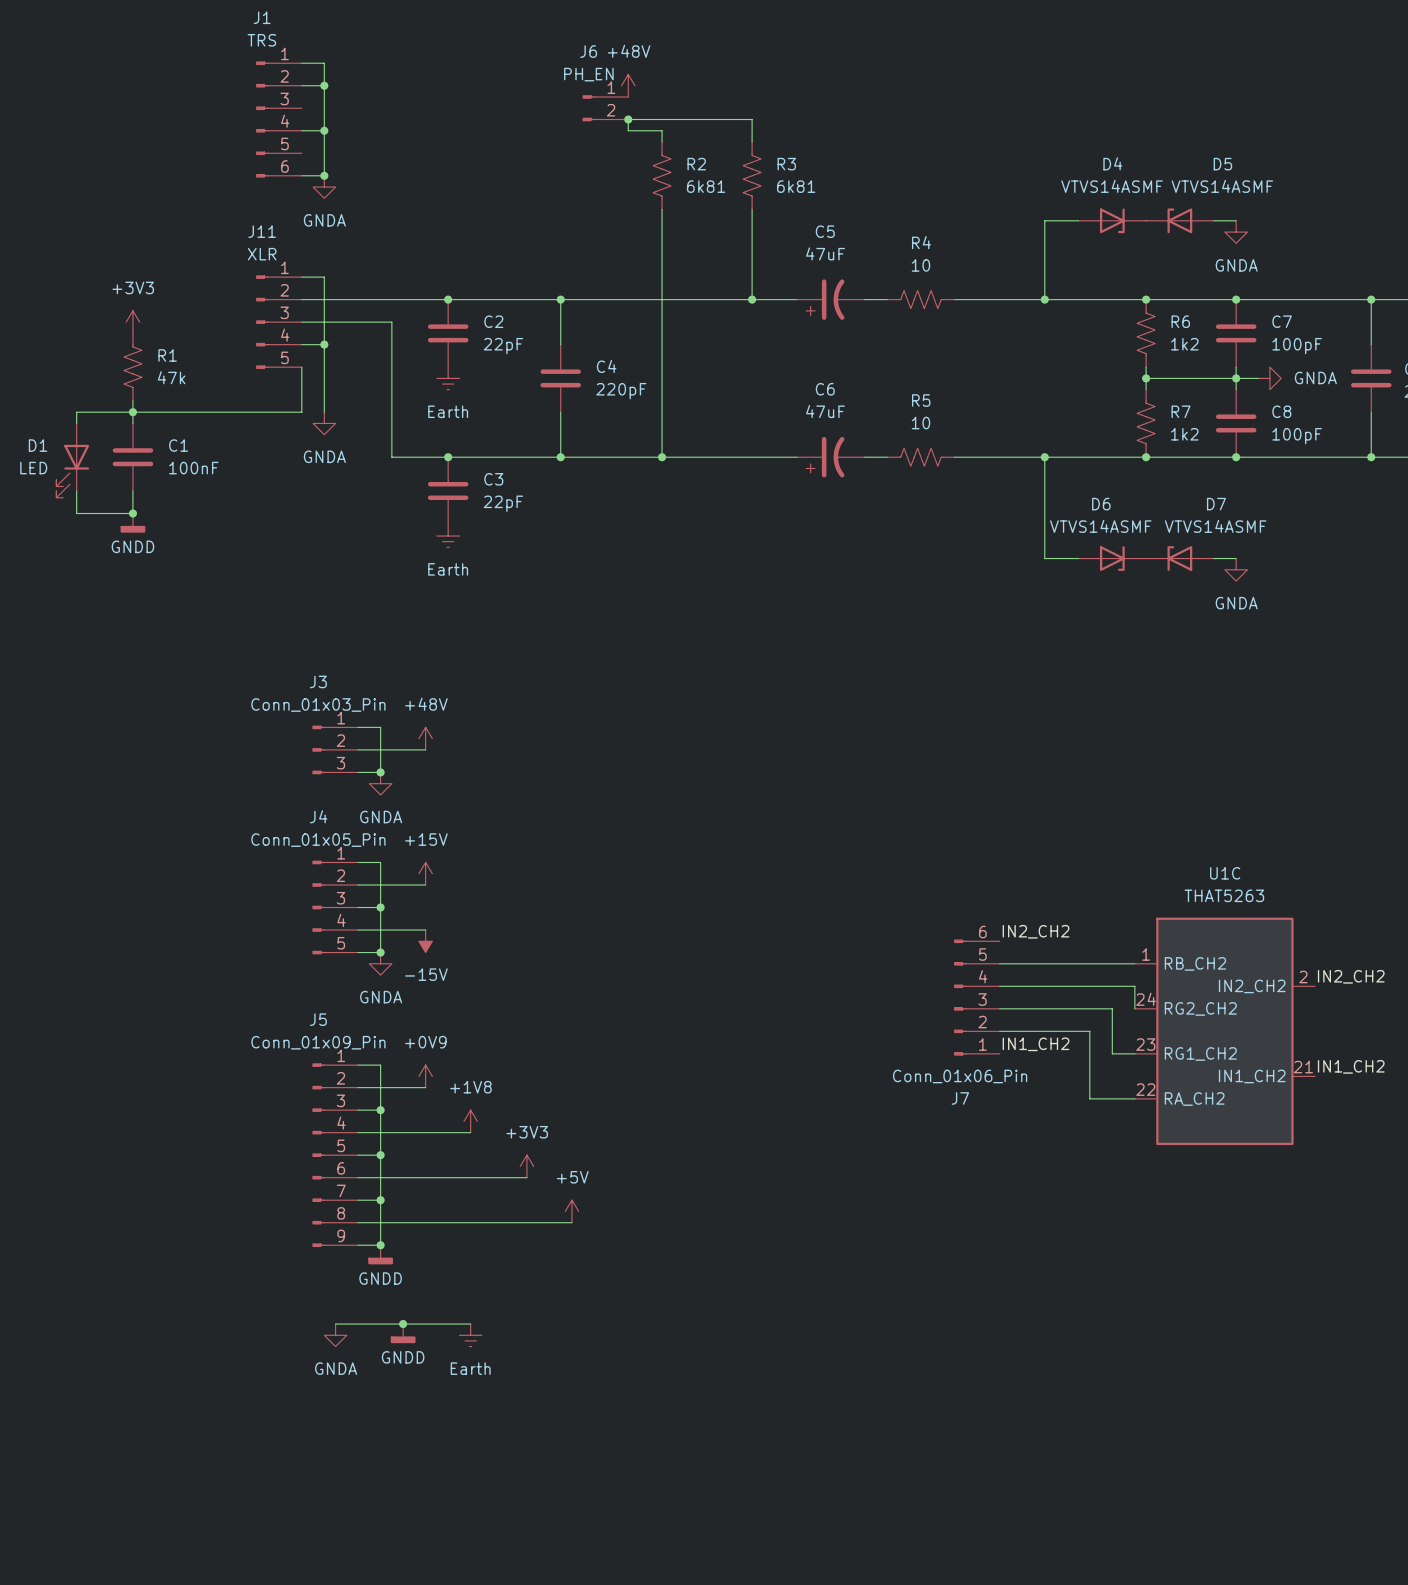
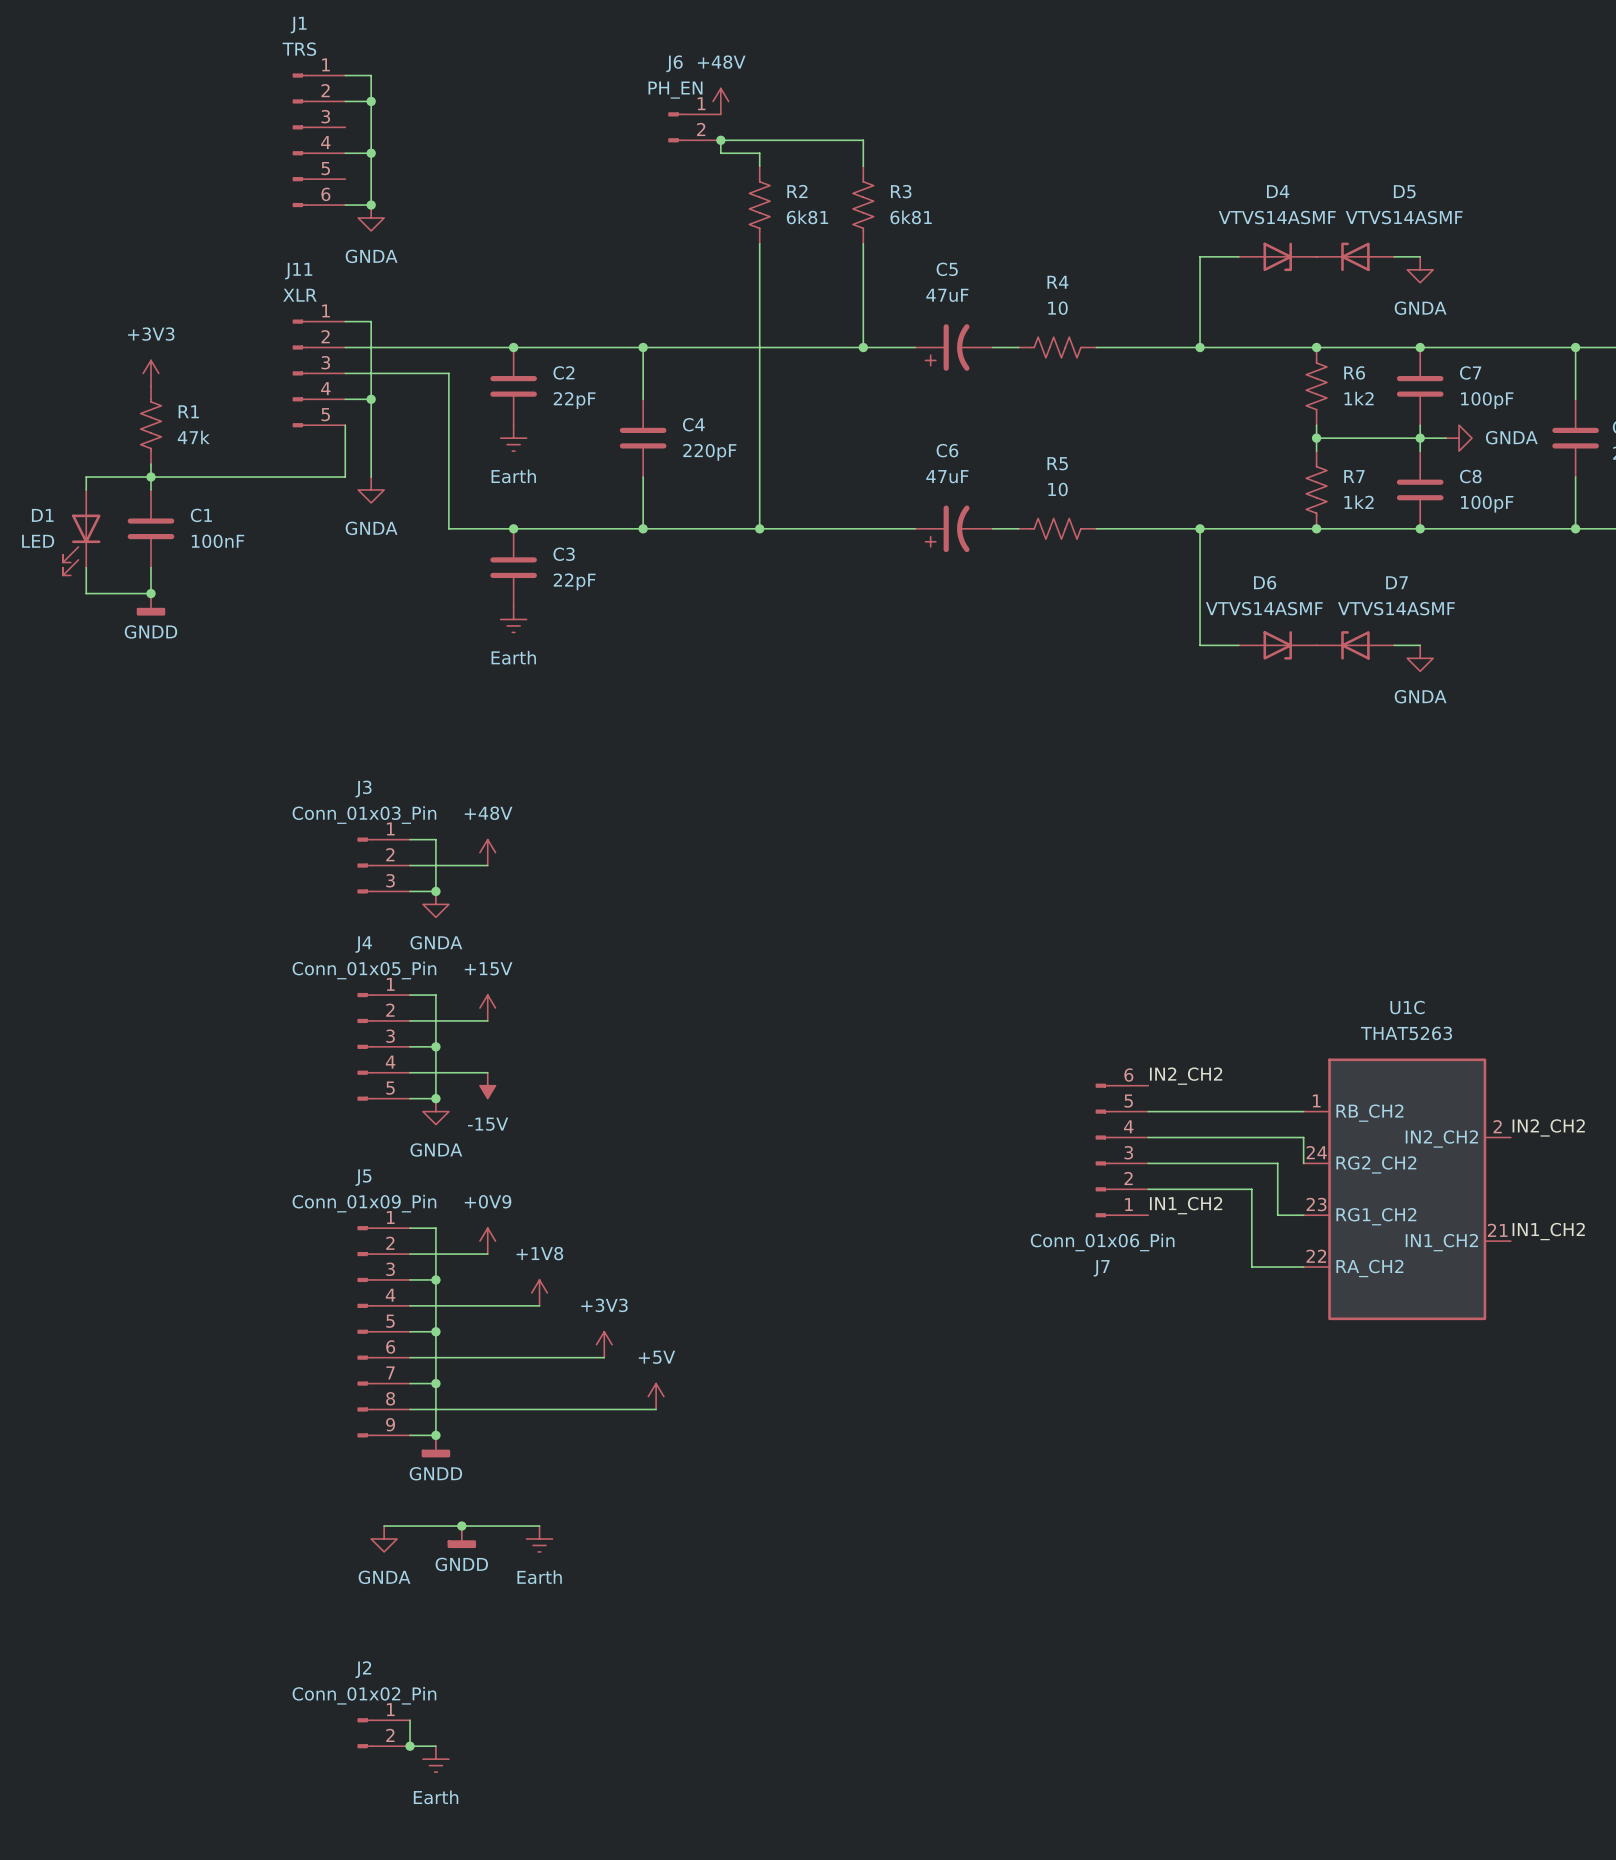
wire: none -> (410, 1720) (410, 1746) (435, 1746)
J2: none -> Conn_01x02_Pin (383, 1733)
junction: none -> (410, 1746)
power symbol: none -> Earth (435, 1759)

